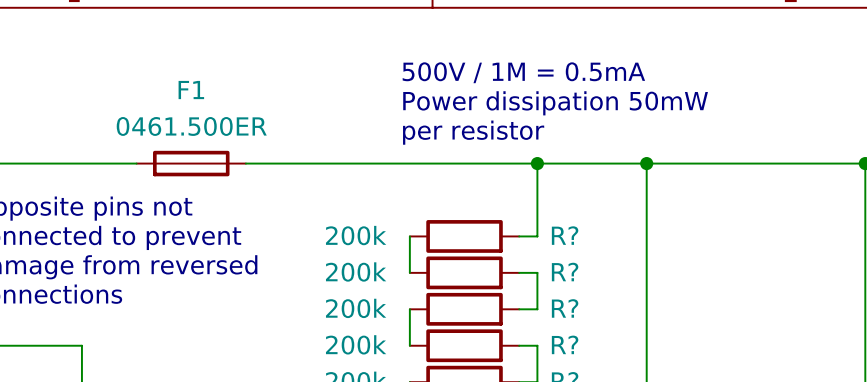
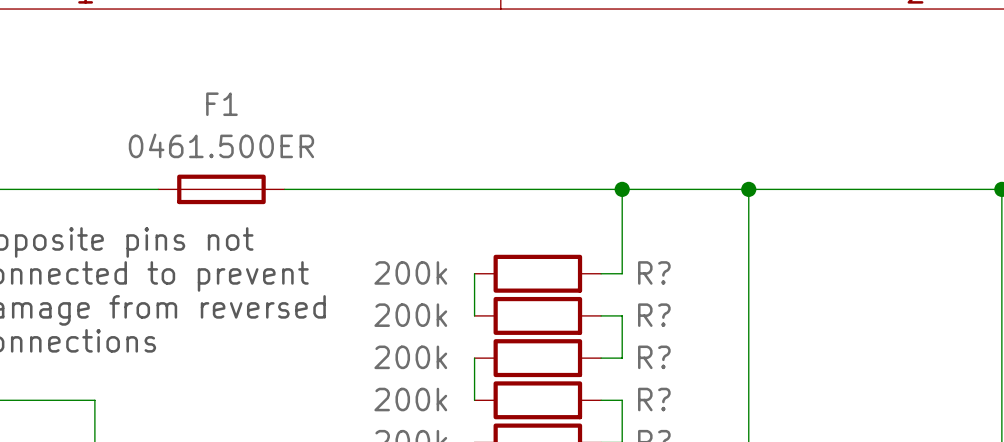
text: 500V / 1M = 0.5mA (523, 72) -> none
text: Power dissipation 50mW (555, 103) -> none
text: per resistor (473, 132) -> none

